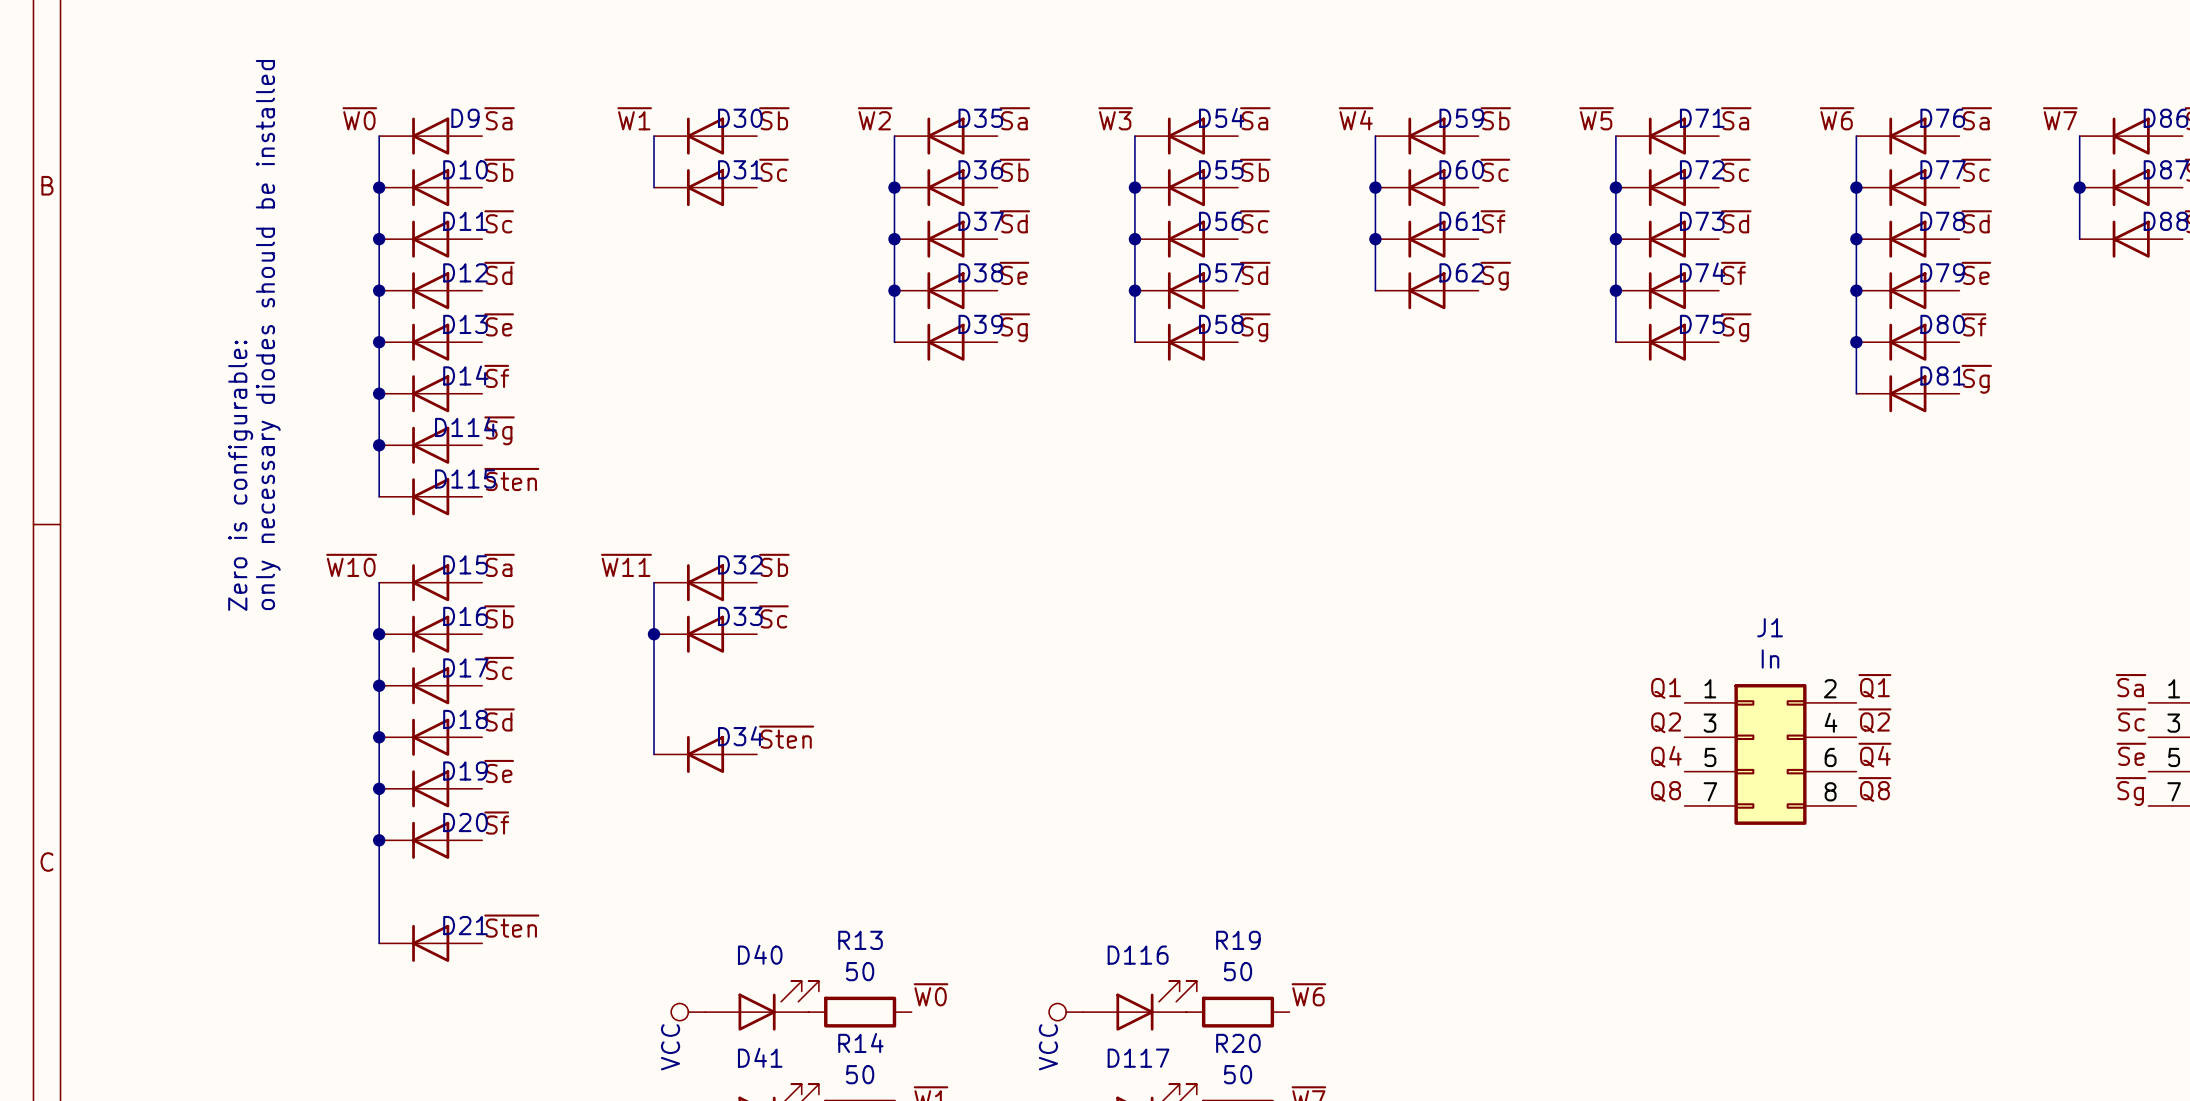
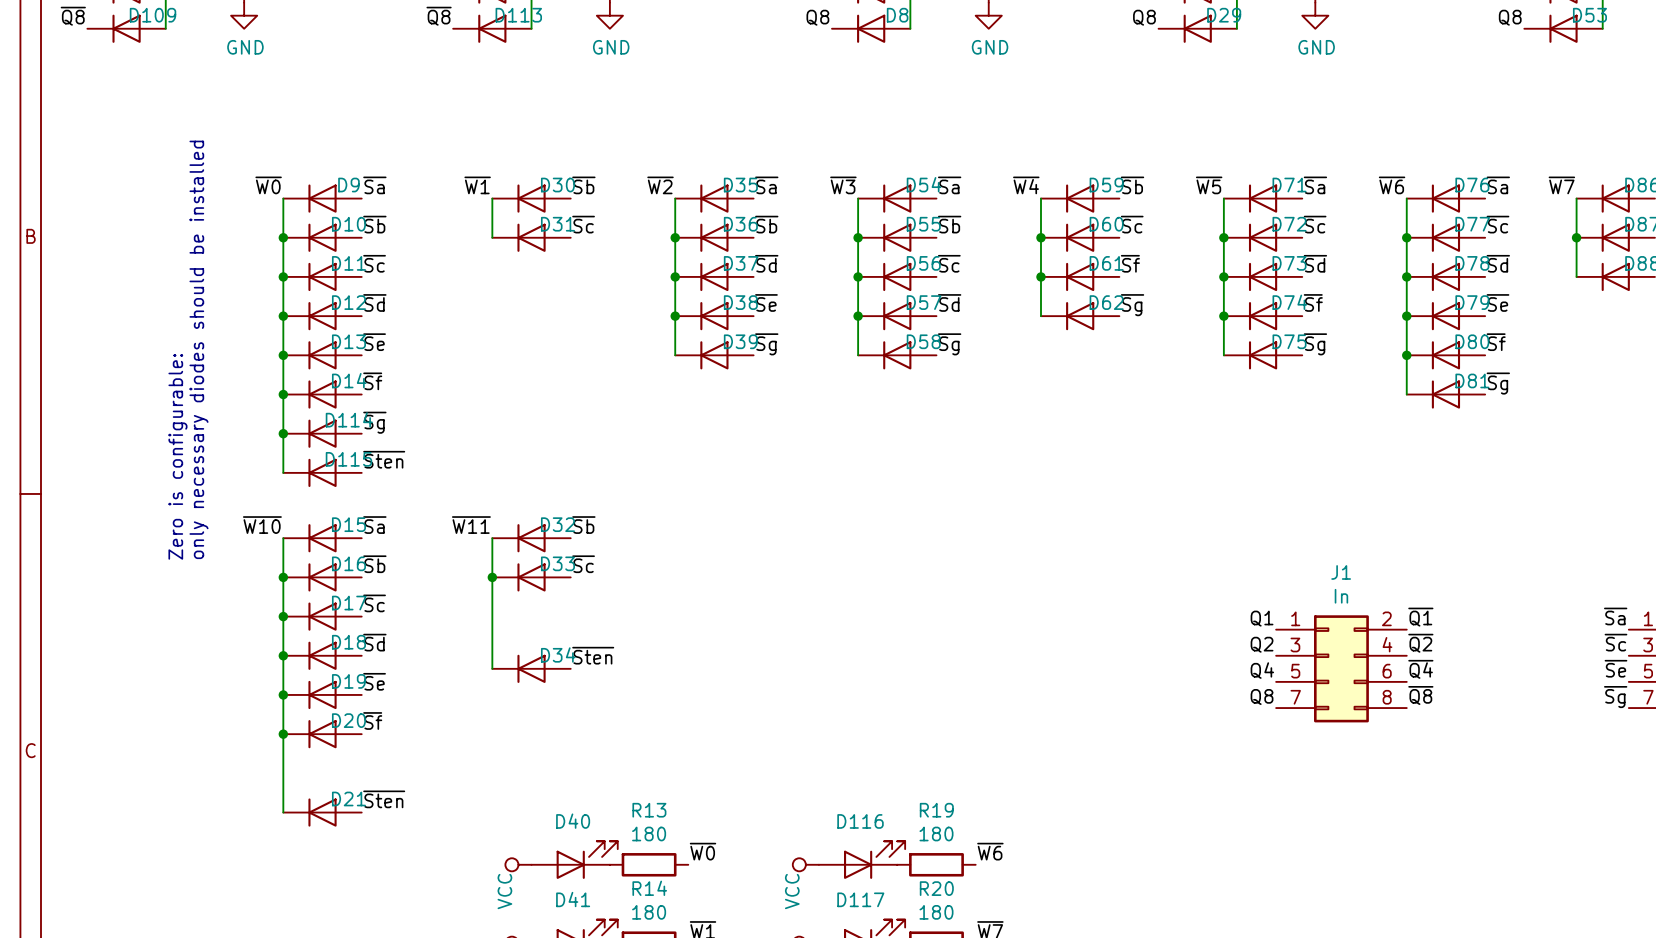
R13 value: 50 (860, 971) -> 180 (649, 833)
R19 value: 50 (1238, 971) -> 180 (936, 833)
R14 value: 50 (860, 1074) -> 180 (649, 912)
R20 value: 50 (1238, 1074) -> 180 (936, 912)

